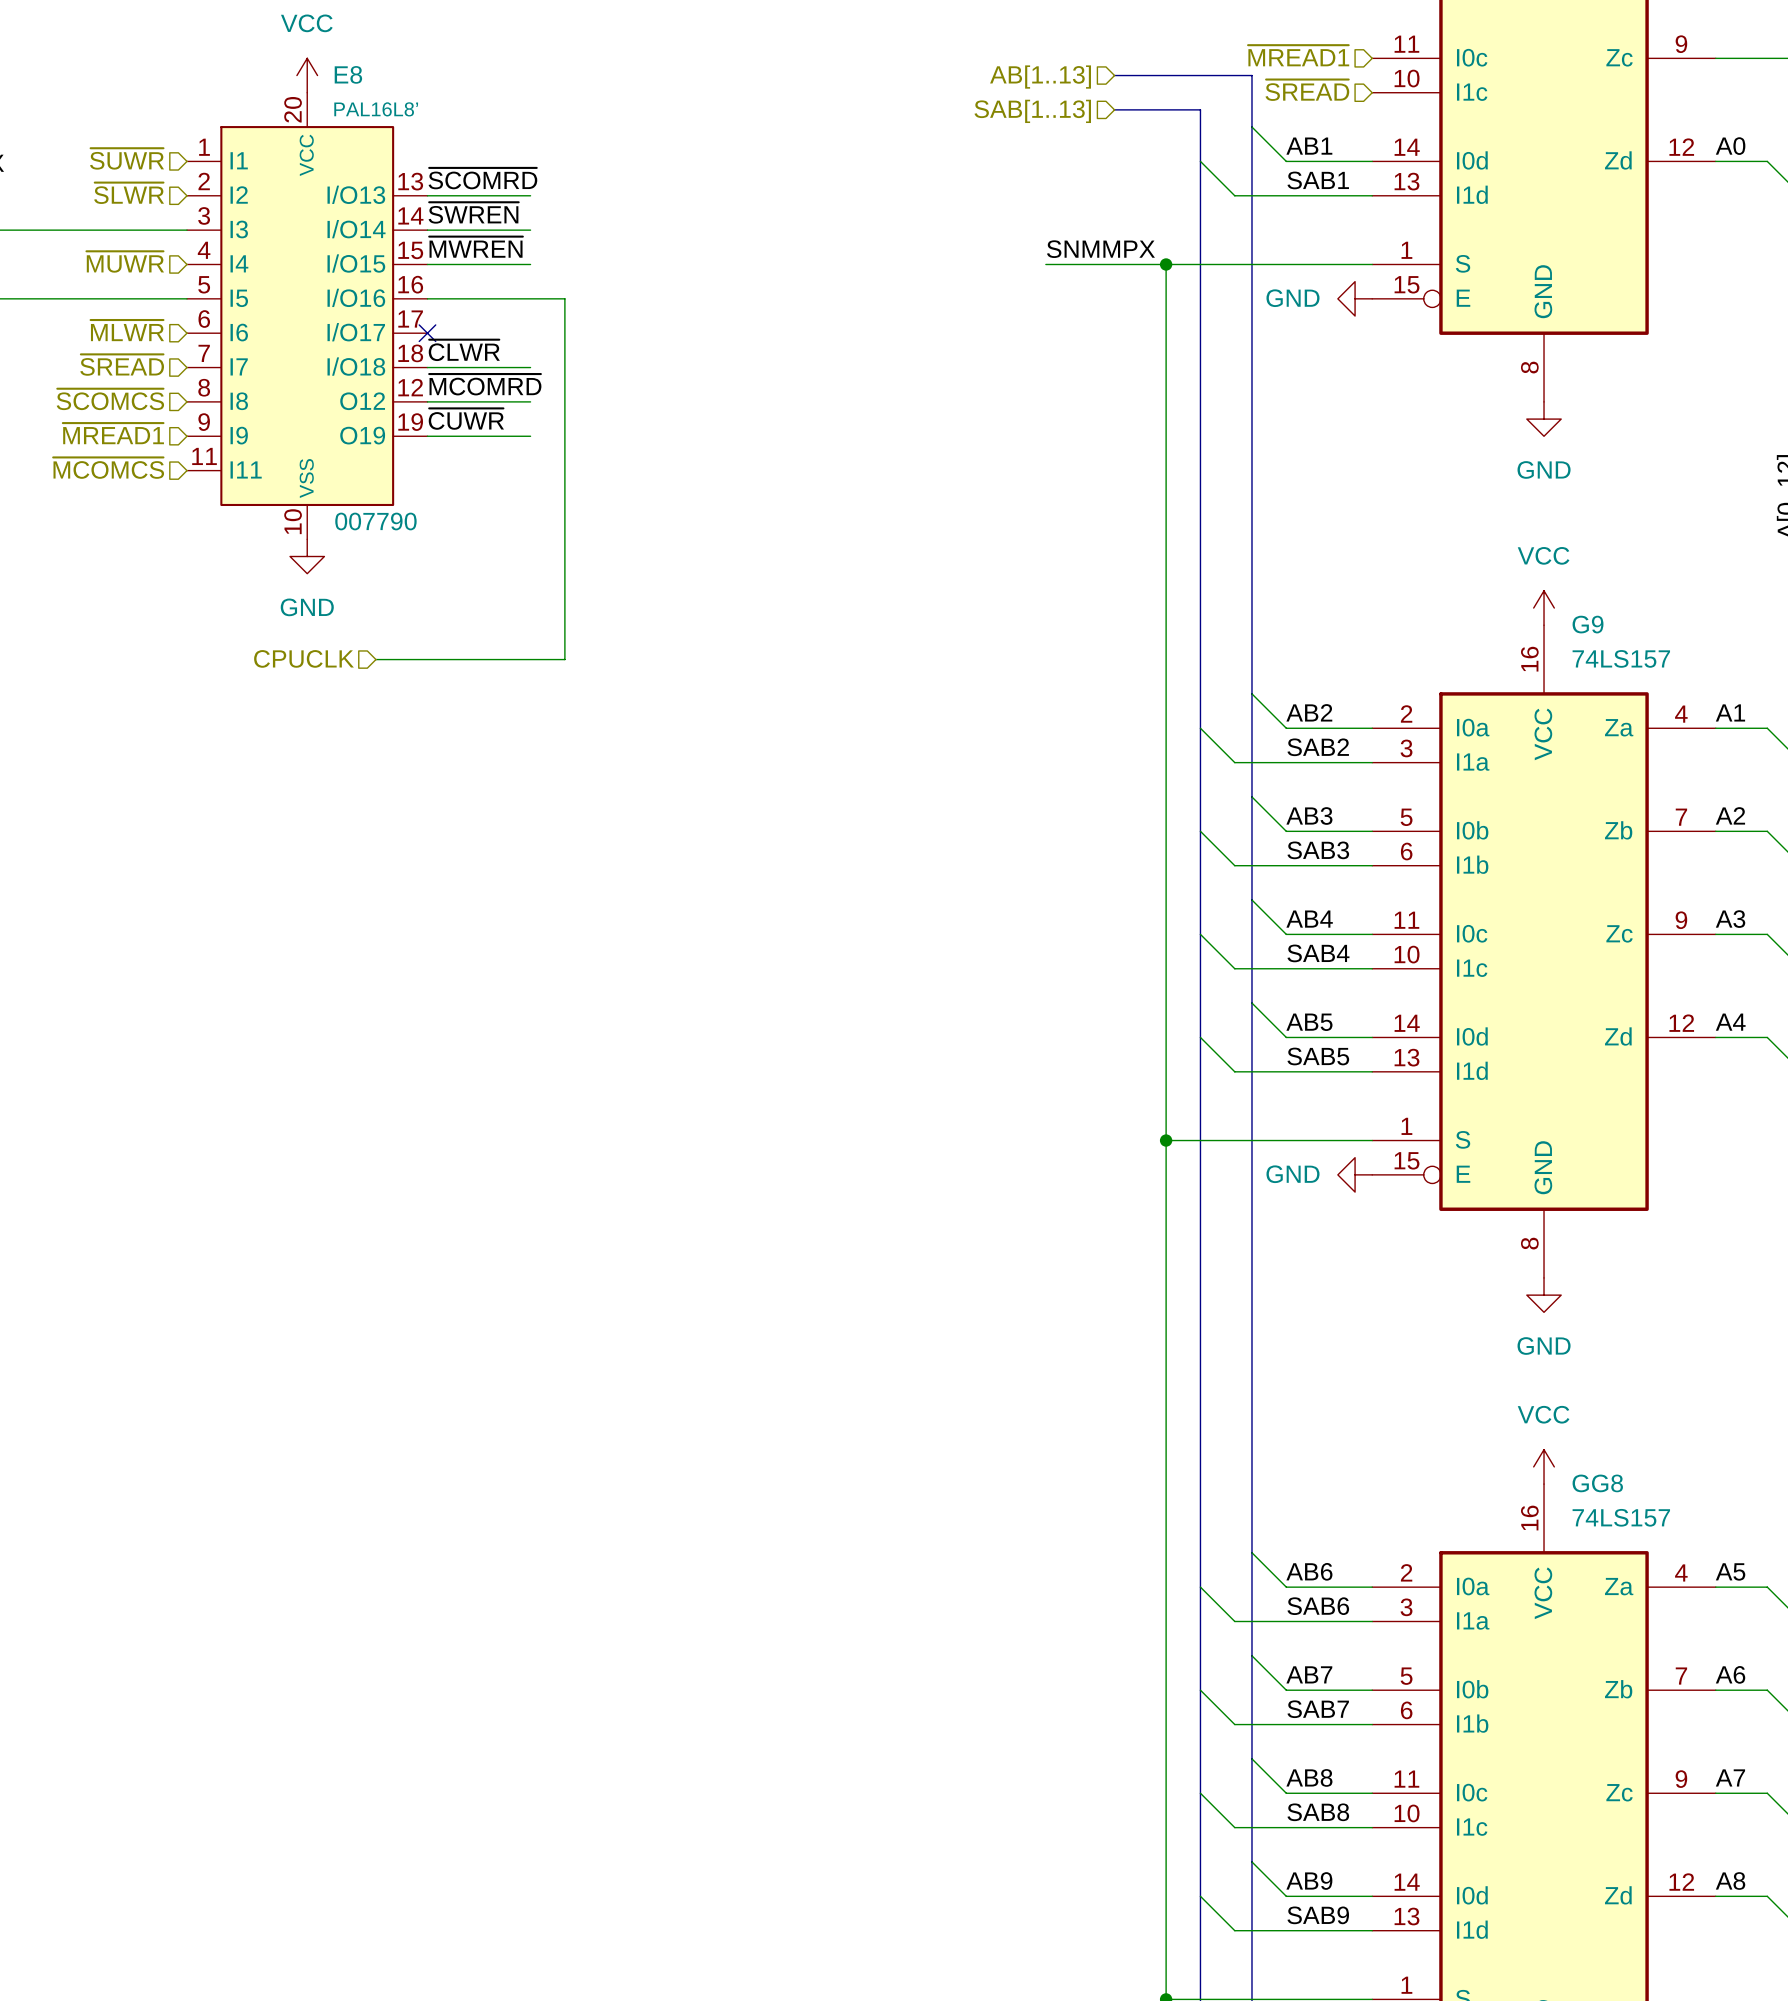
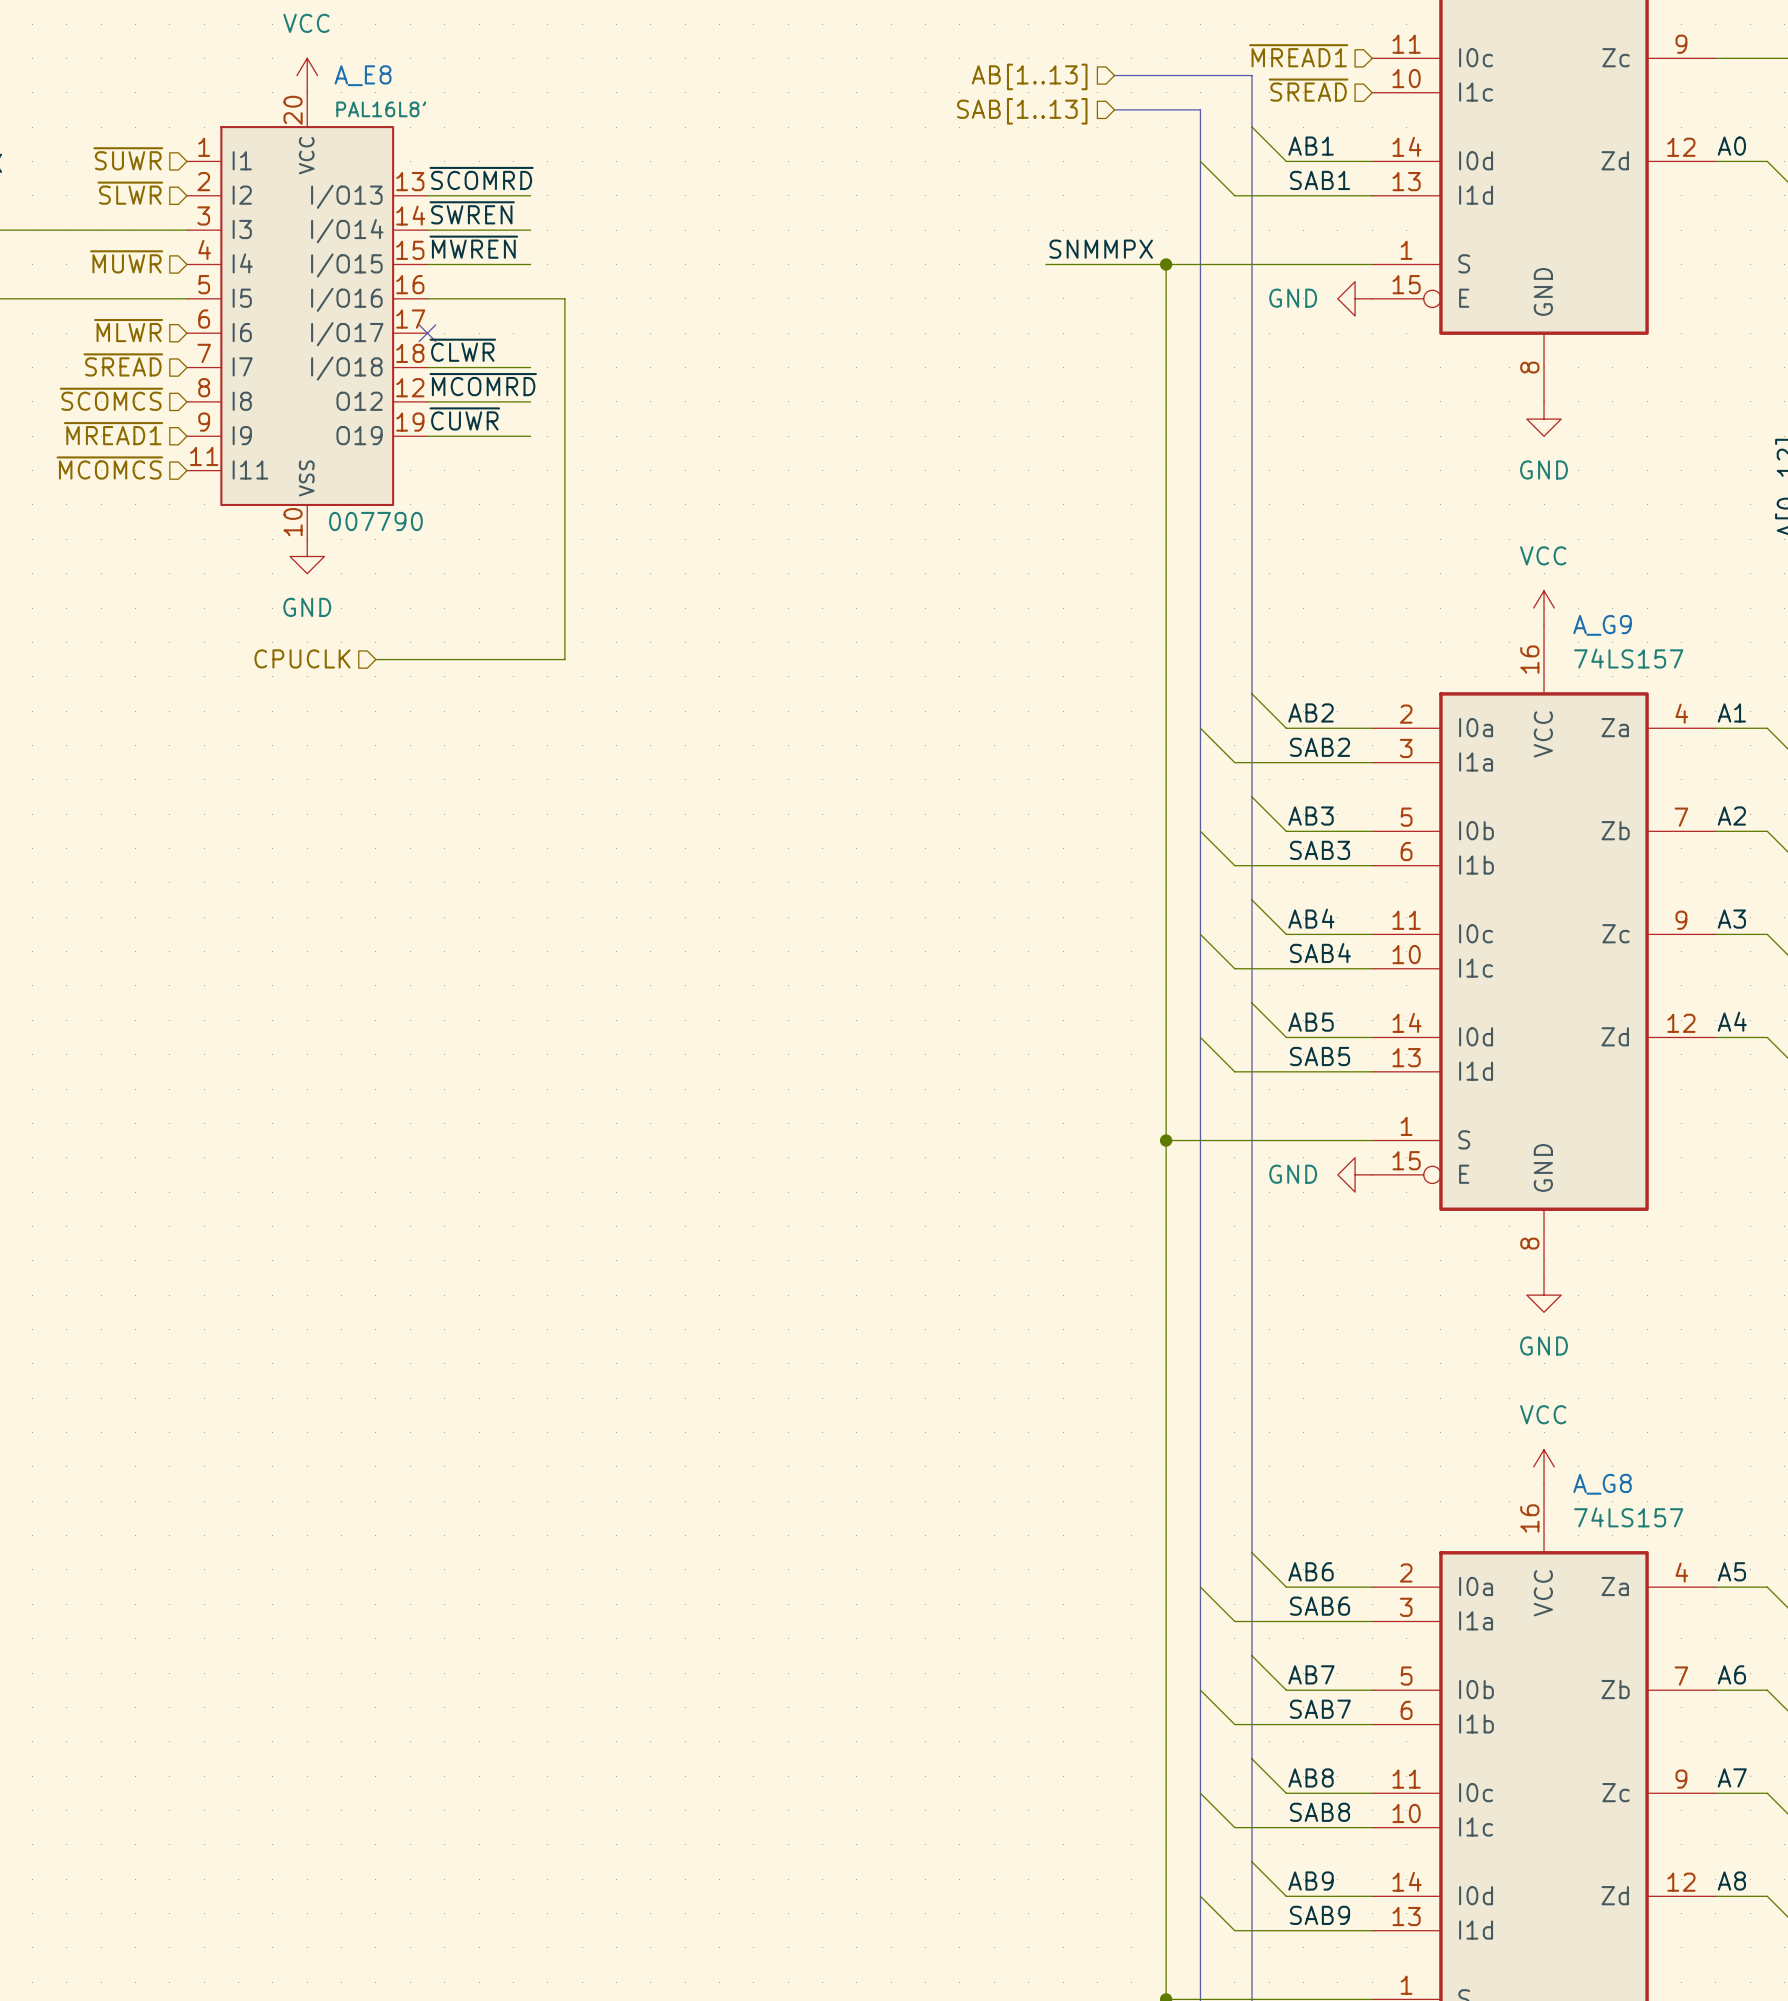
E8 name: E8 (348, 74) -> A_E8 (363, 75)
G9 name: G9 (1588, 624) -> A_G9 (1602, 625)
GG8 name: GG8 (1597, 1483) -> A_G8 (1602, 1484)

